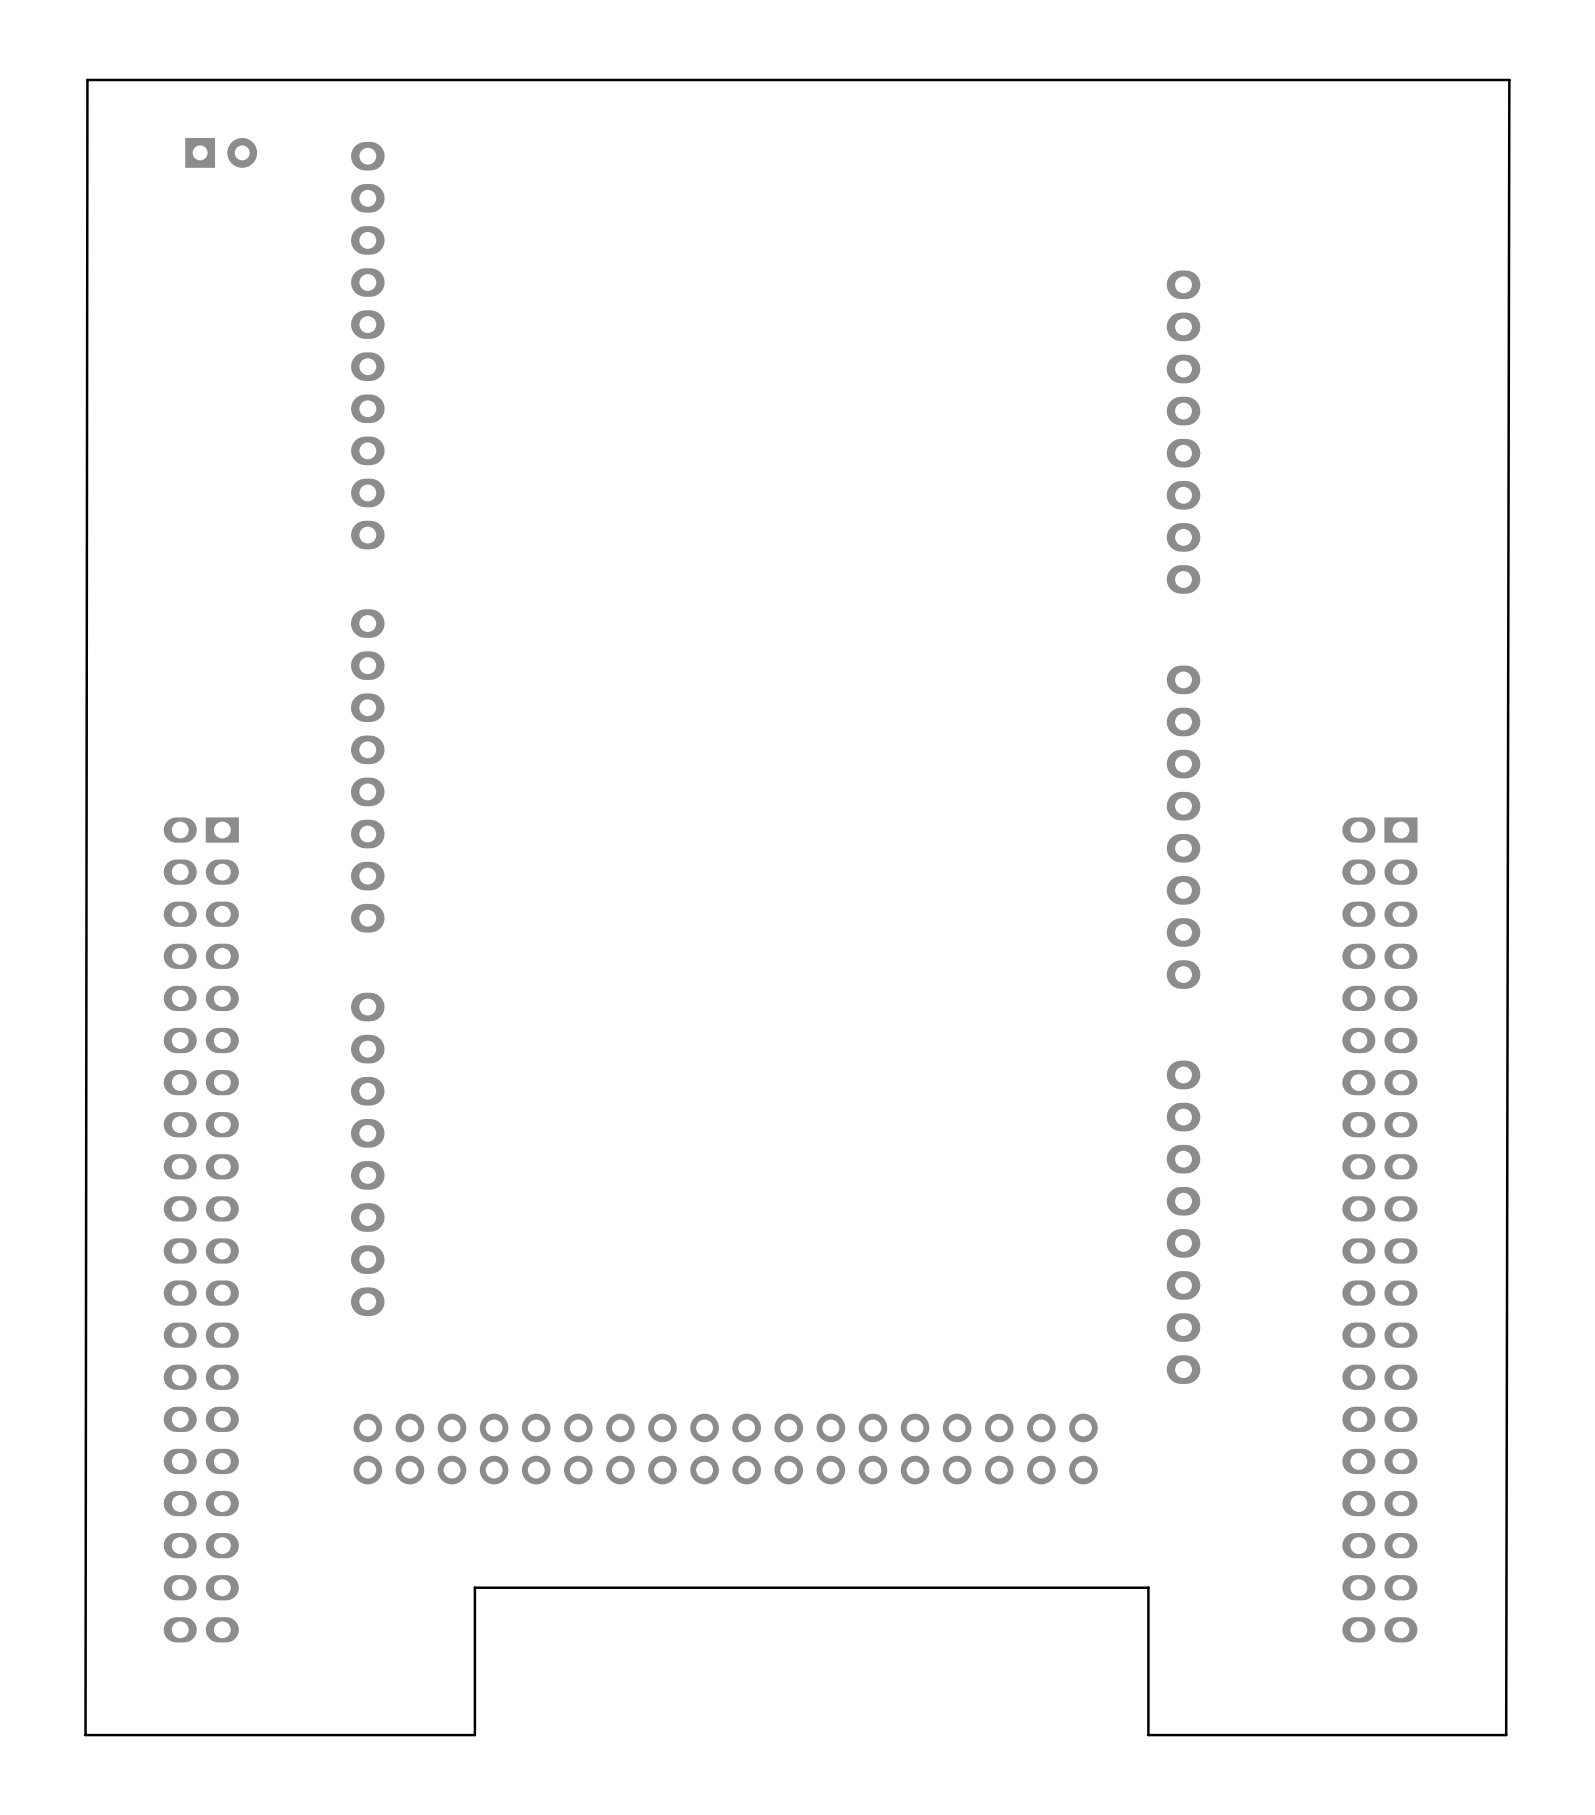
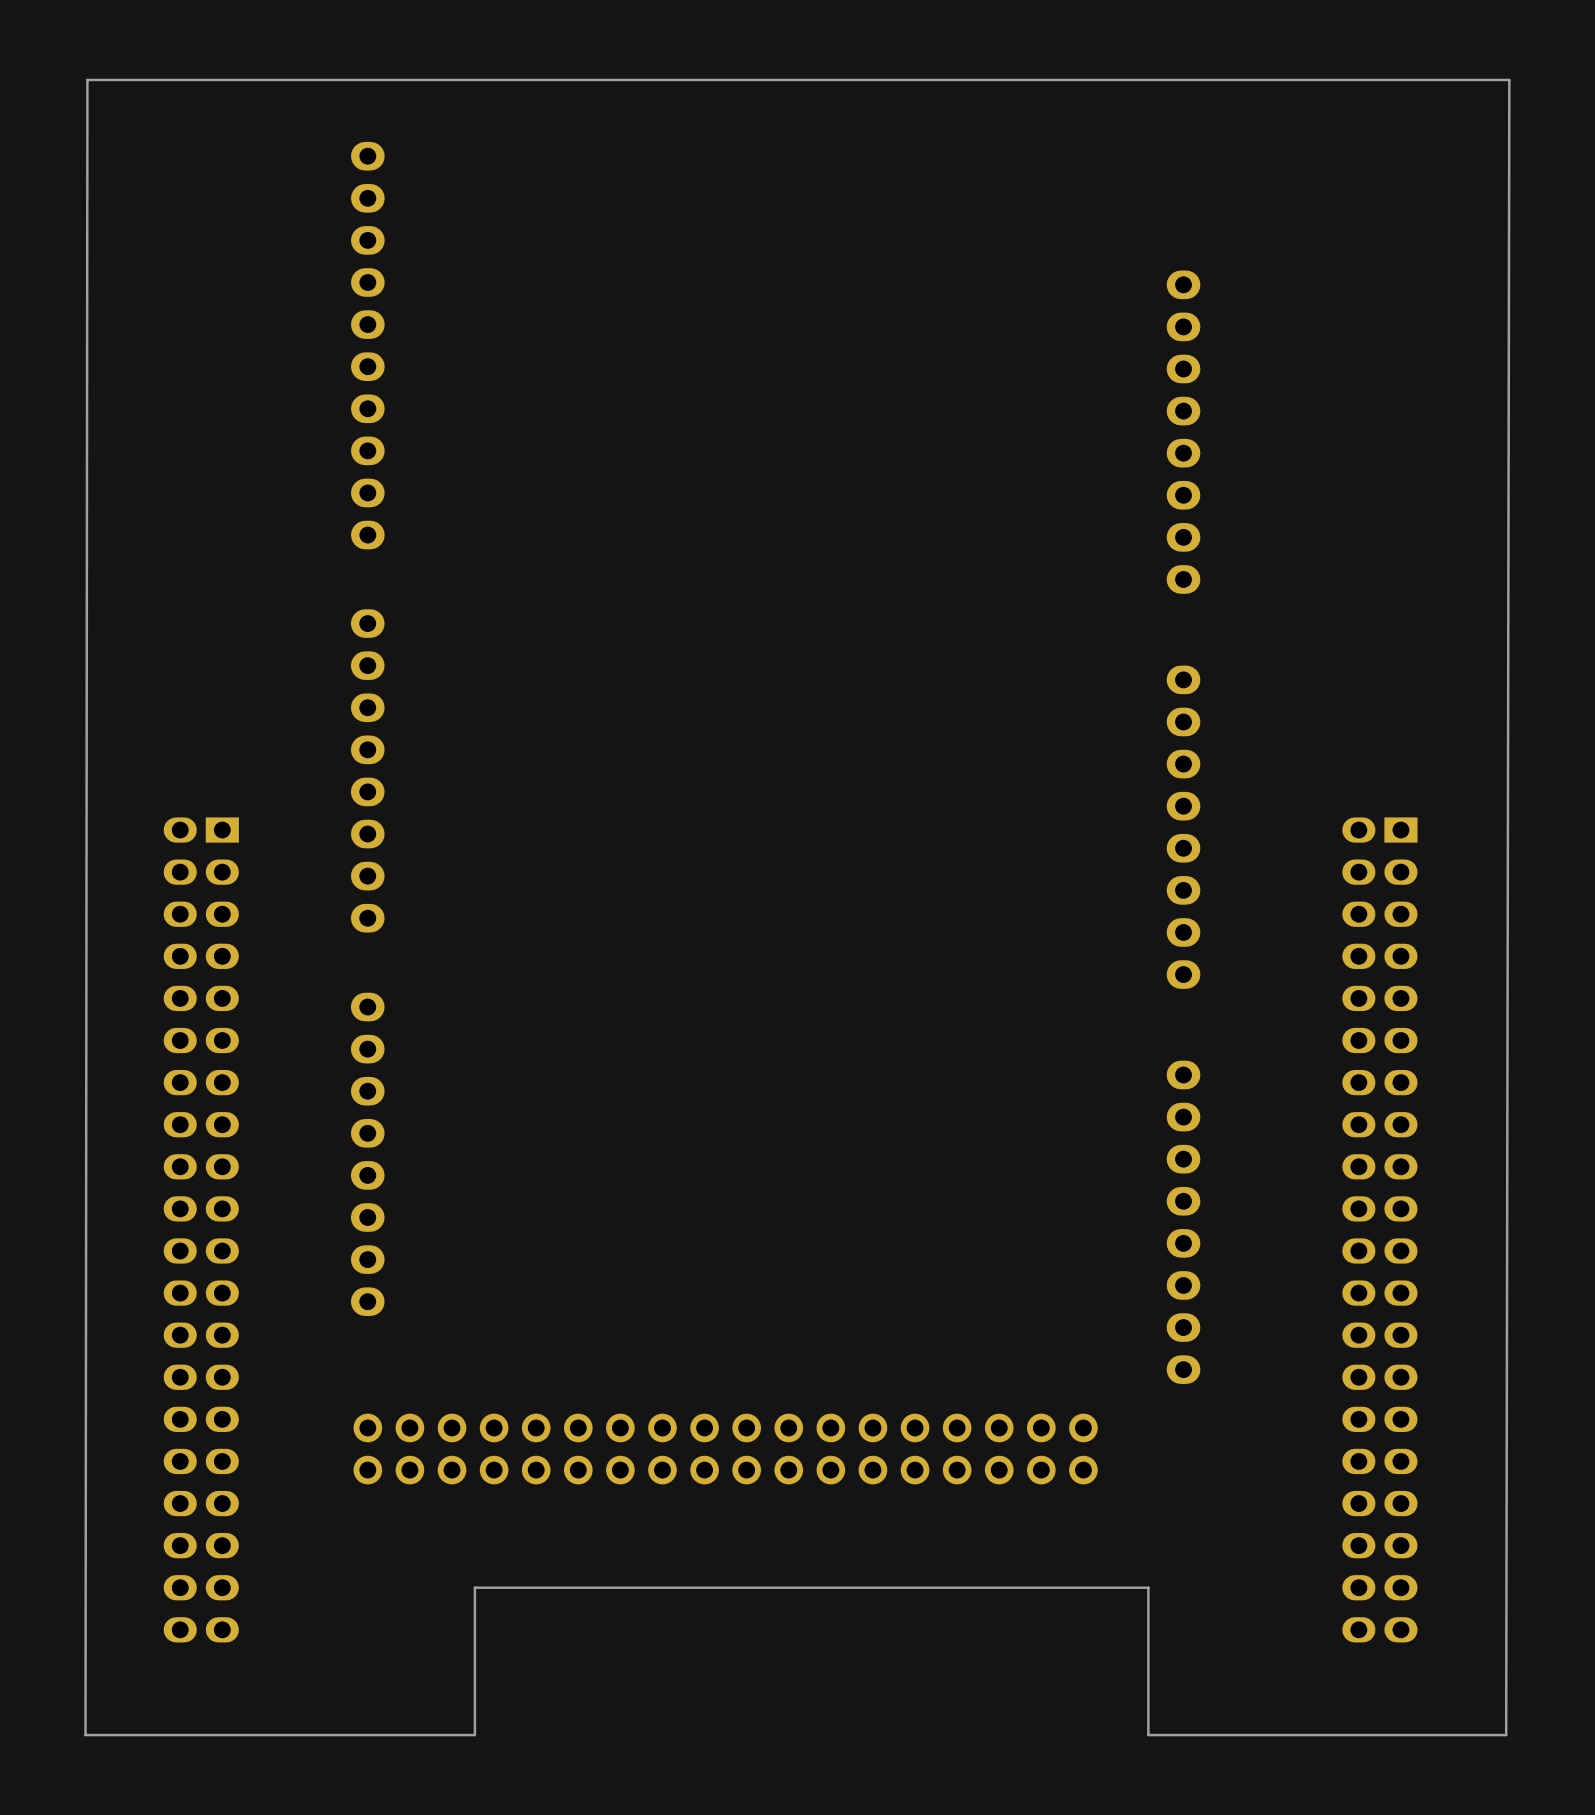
part: (221, 152) -> none

